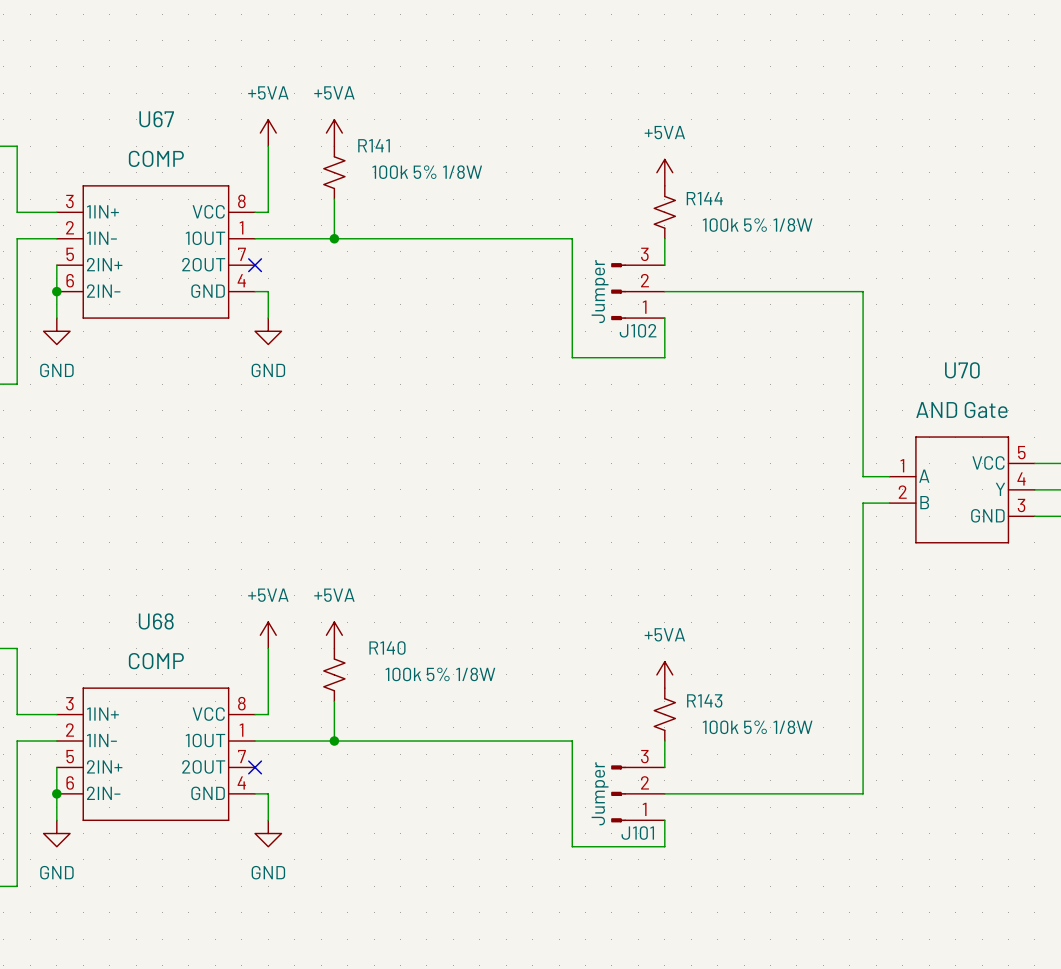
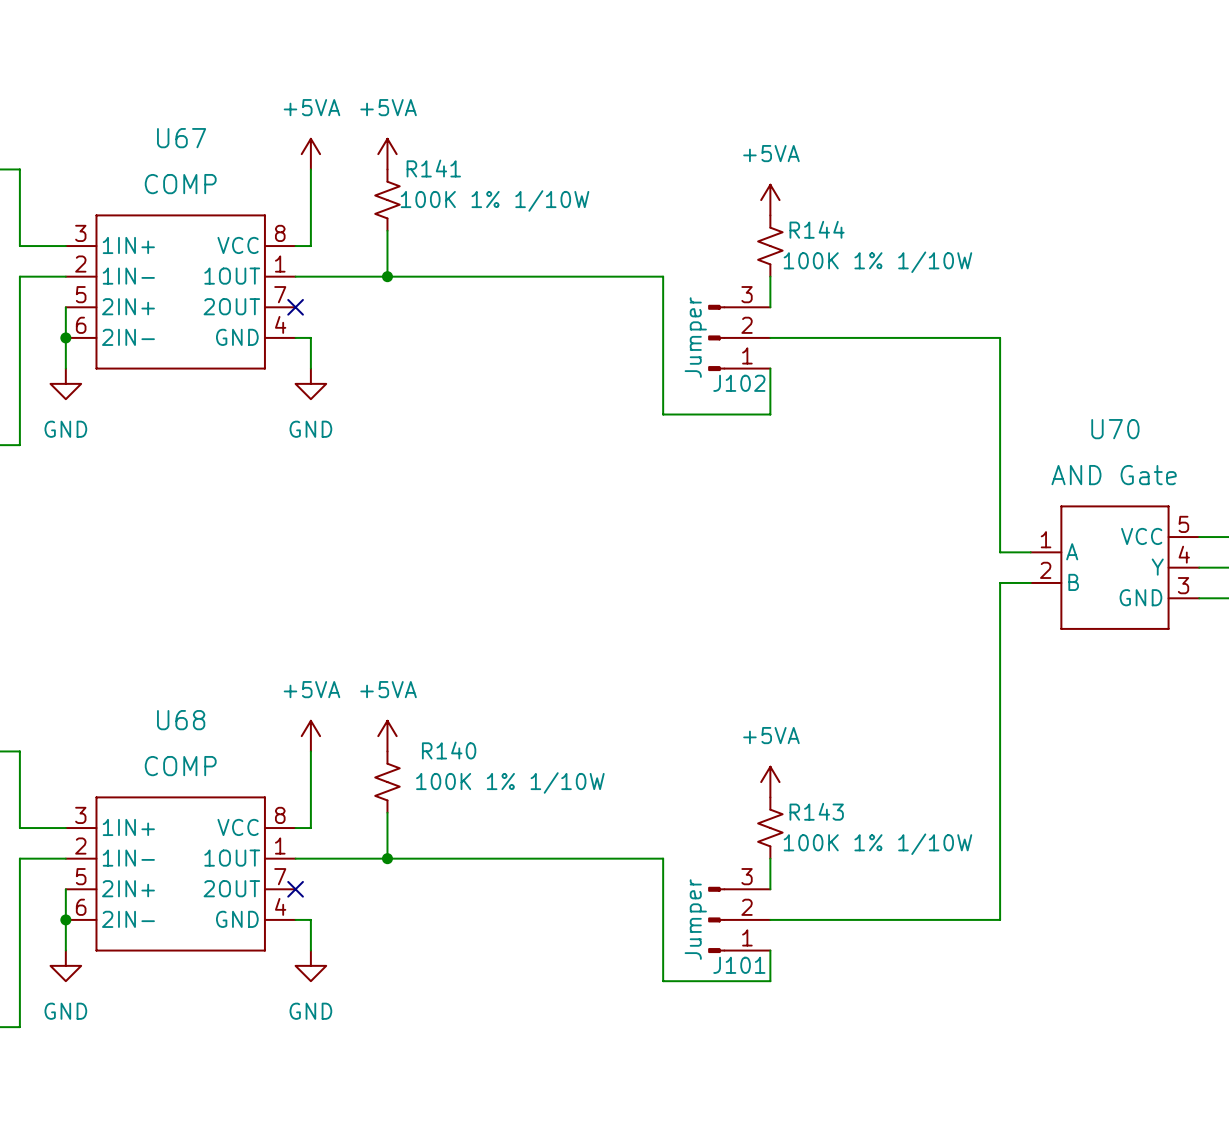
R141 value: 100k 5% 1/8W (427, 172) -> 100K 1% 1/10W (495, 200)
R144 value: 100k 5% 1/8W (757, 225) -> 100K 1% 1/10W (877, 262)
R140 value: 100k 5% 1/8W (440, 674) -> 100K 1% 1/10W (510, 782)
R143 value: 100k 5% 1/8W (757, 727) -> 100K 1% 1/10W (877, 844)

